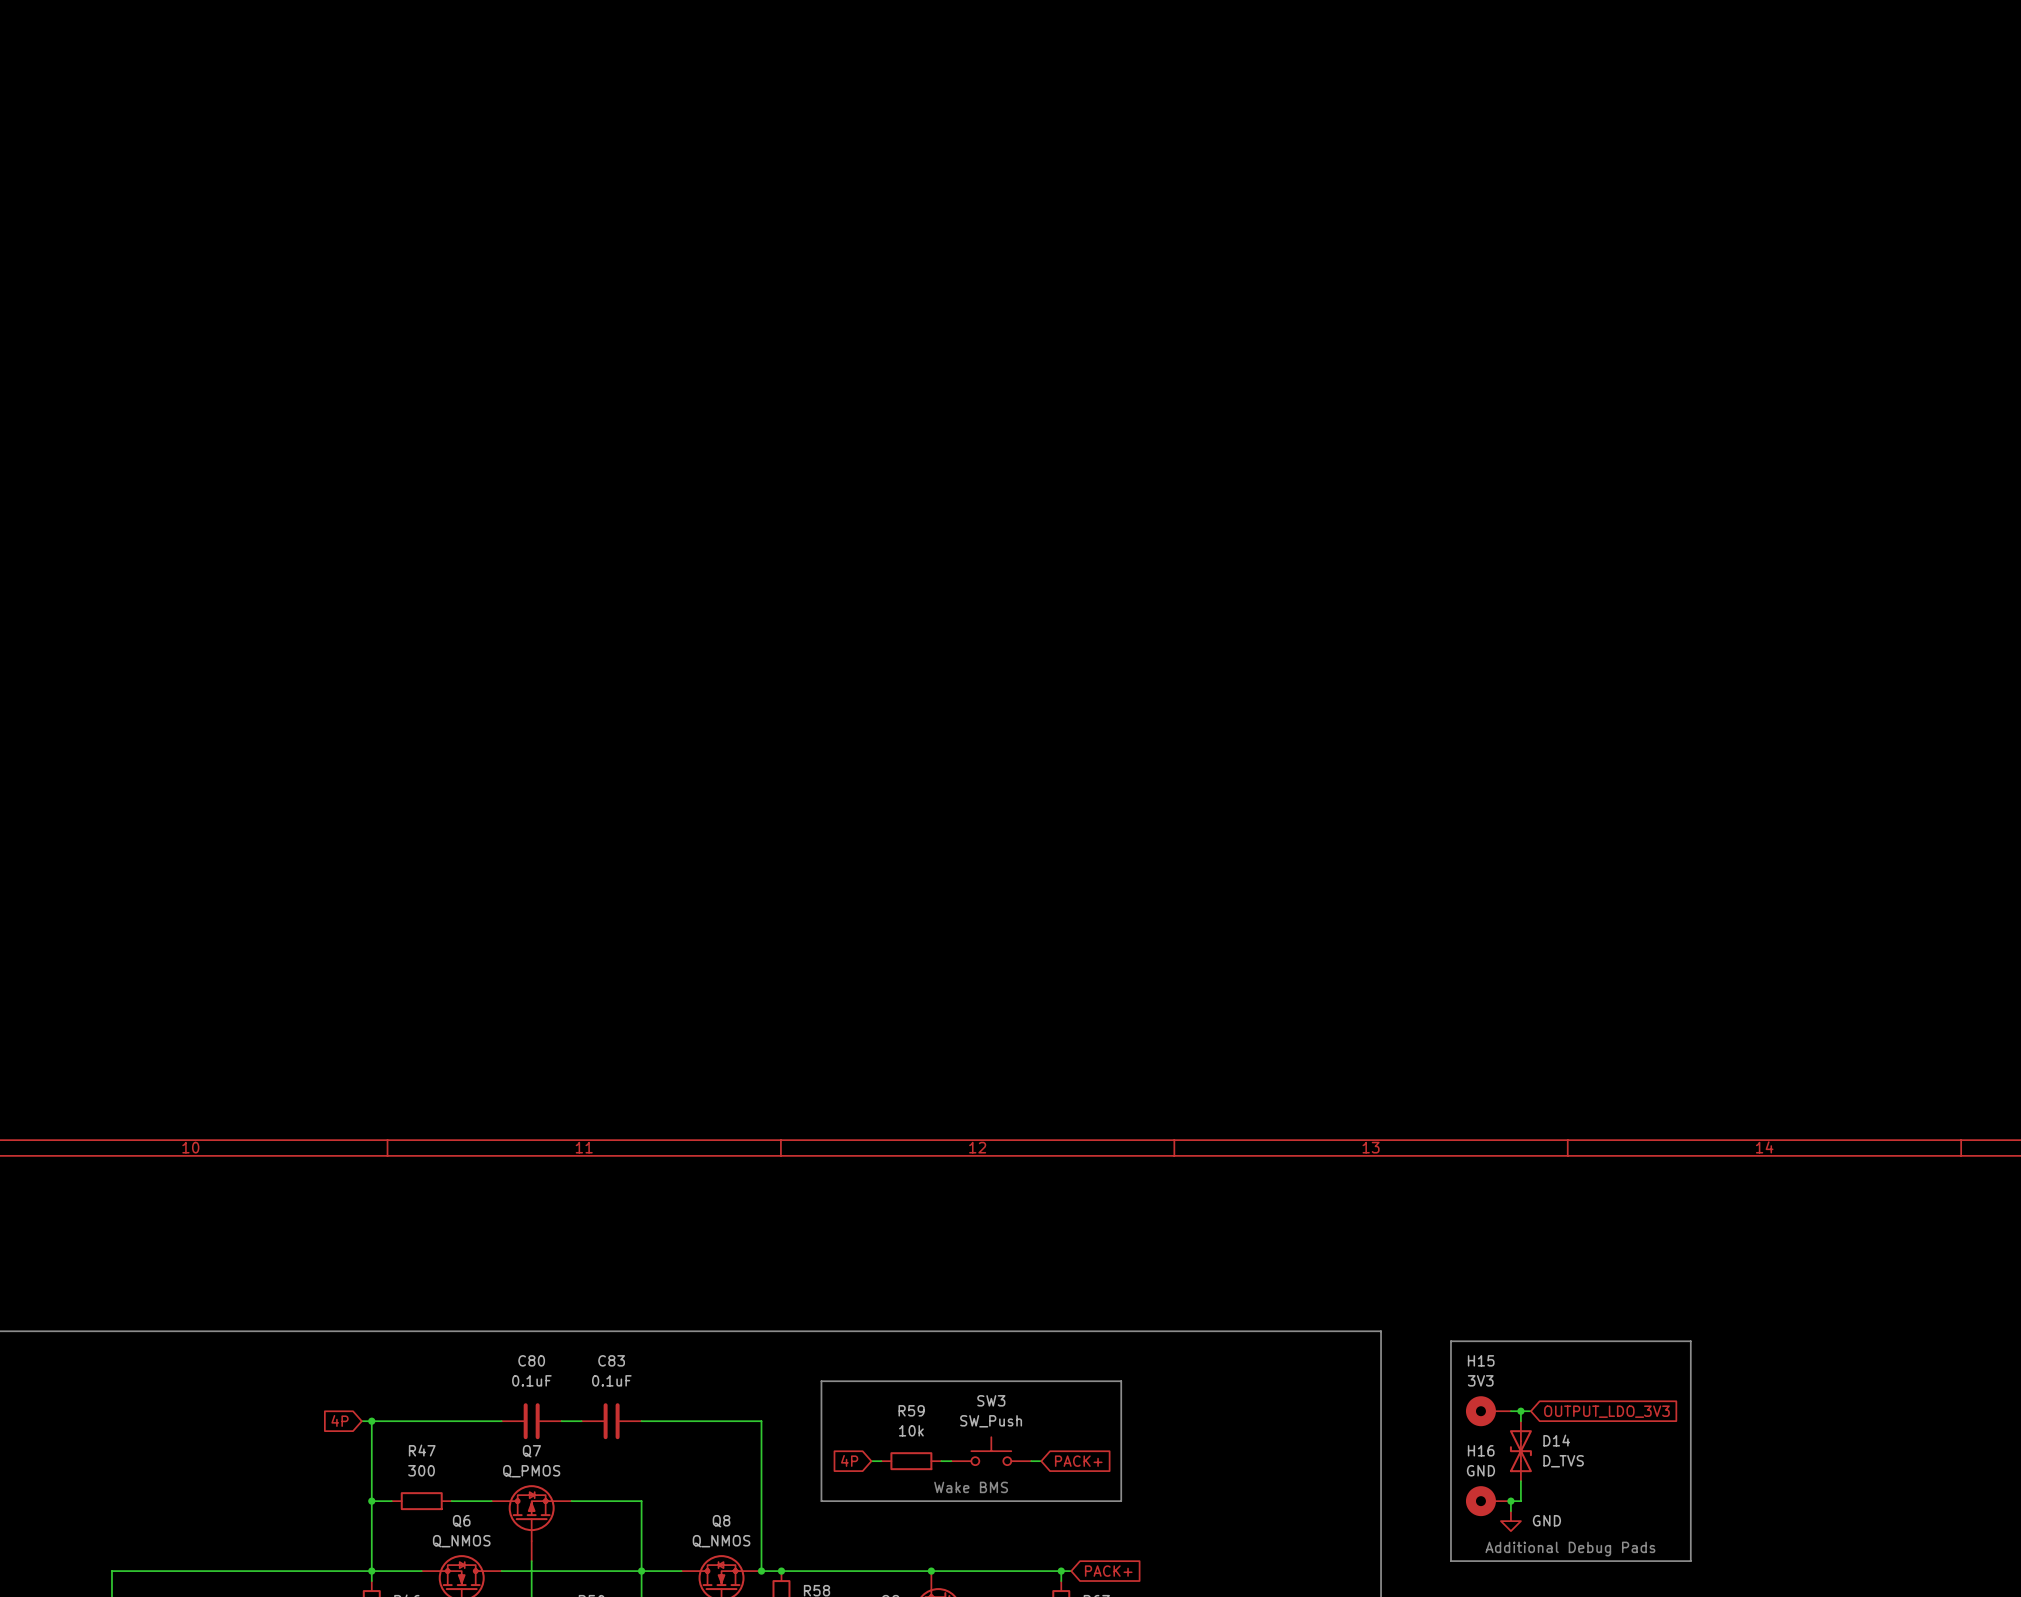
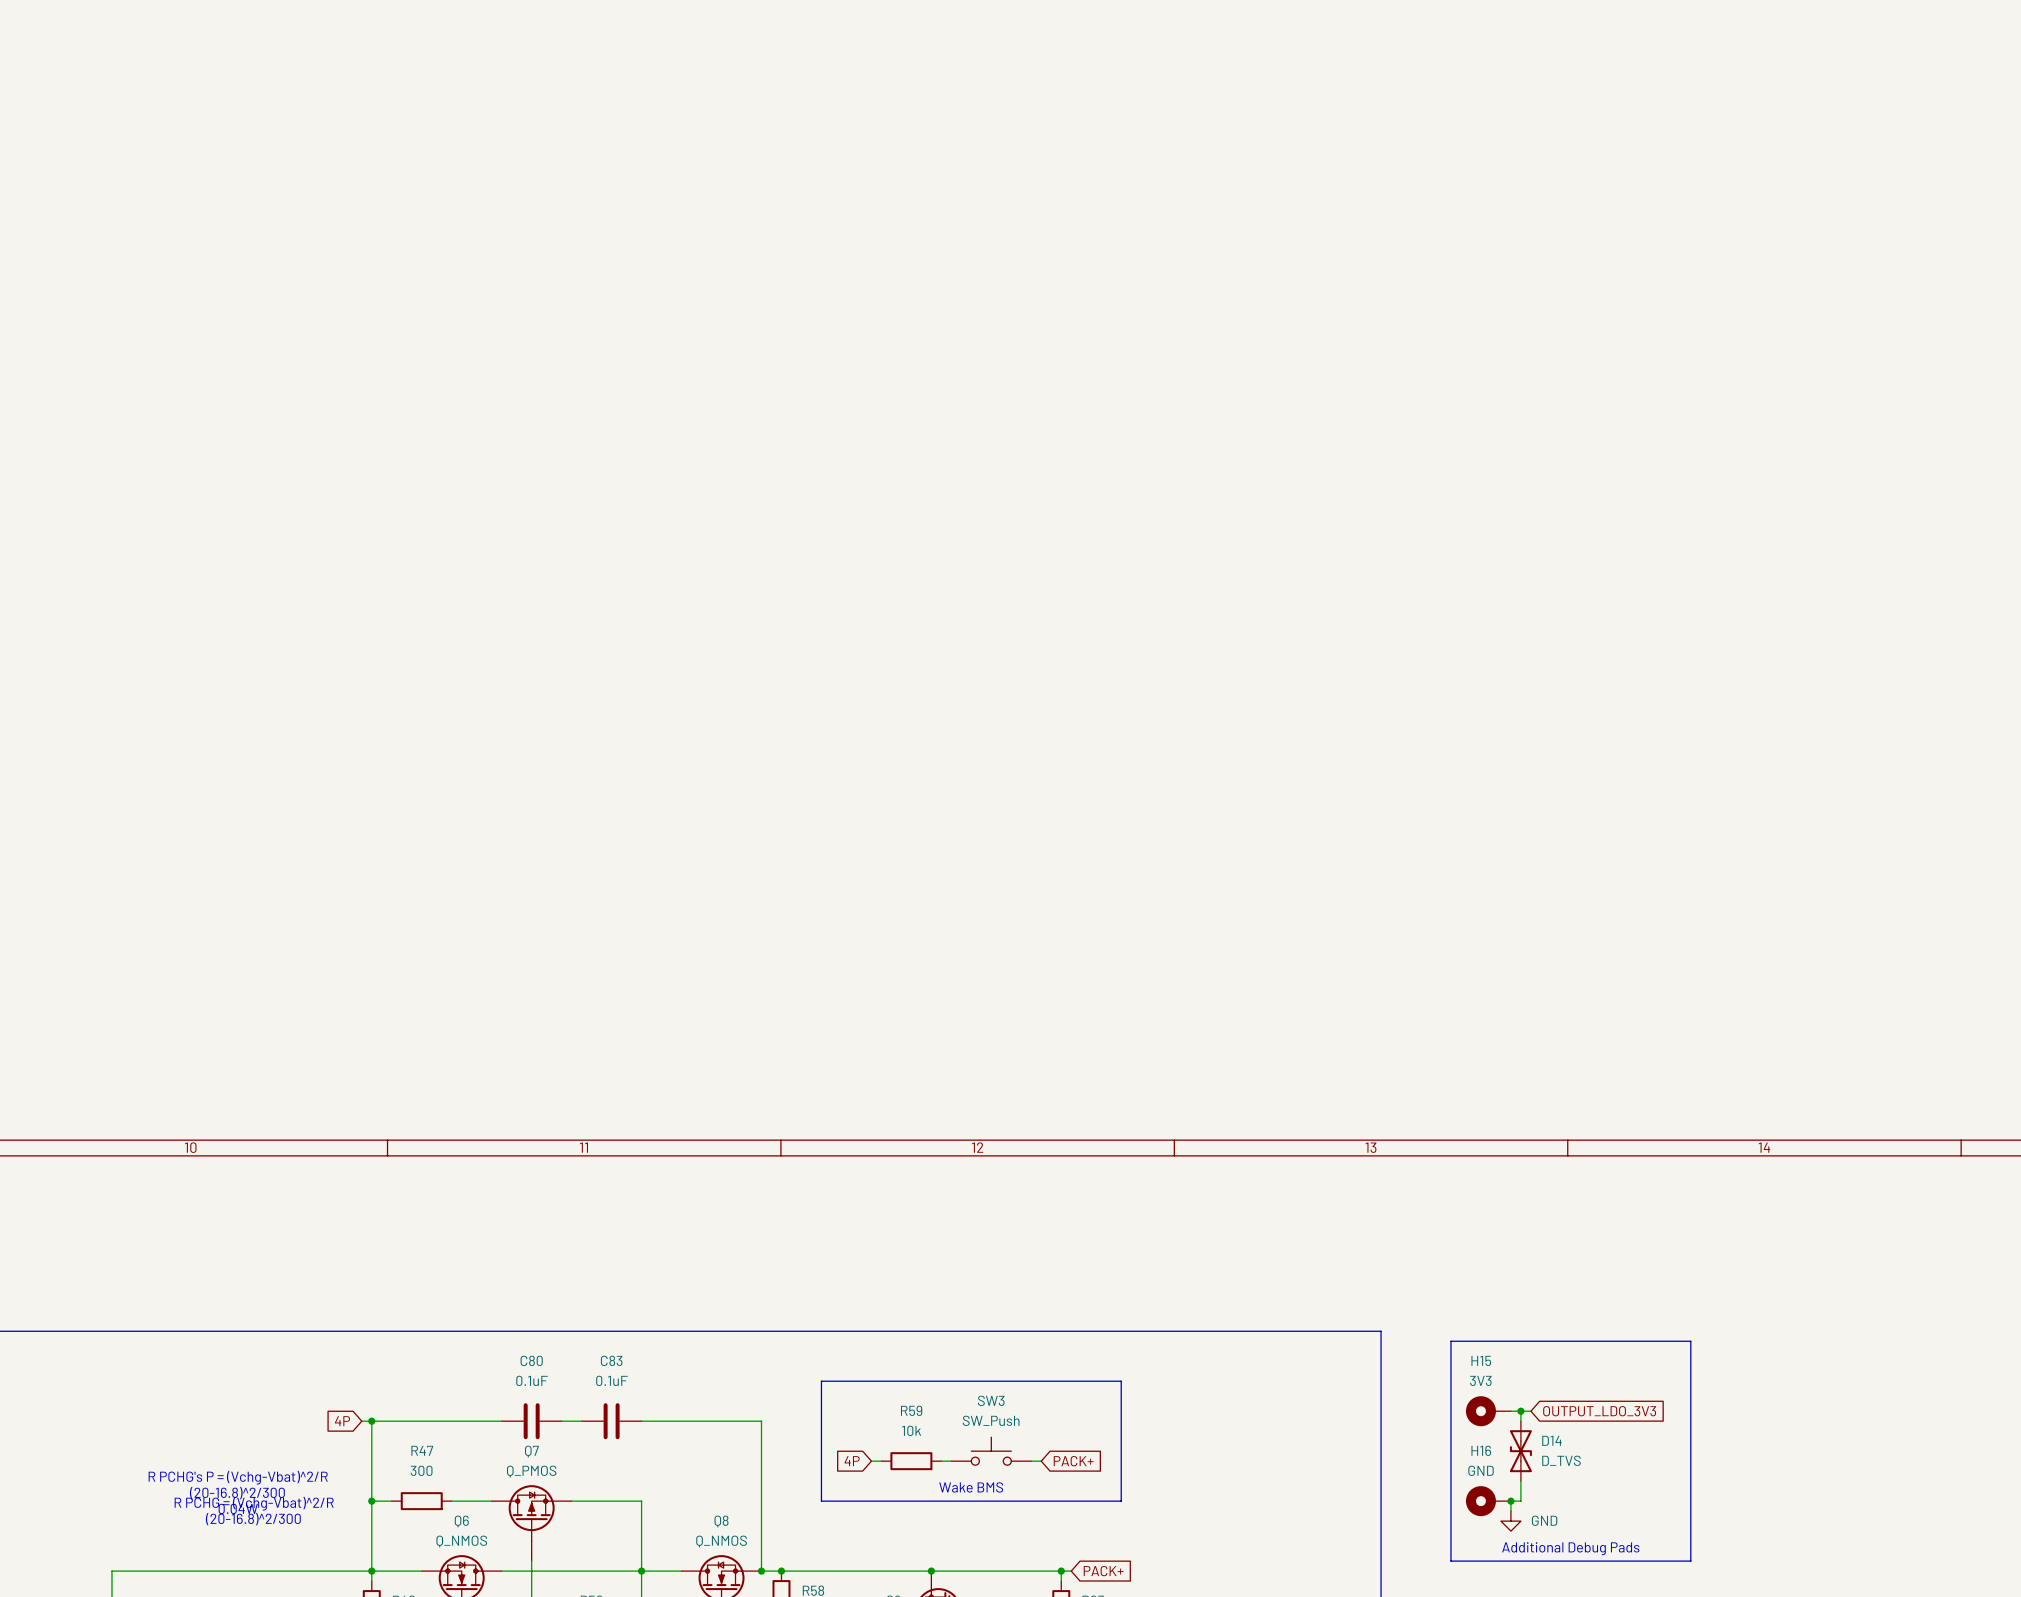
text: none -> R PCHG's P = (Vchg-Vbat)^2/R (238, 1477)
text: none -> (20-16.8)^2/300 (237, 1493)
text: none -> R PCHG = (Vchg-Vbat)^2/R (254, 1503)
text: none -> 0.04W (238, 1508)
text: none -> (20-16.8)^2/300 (253, 1519)

